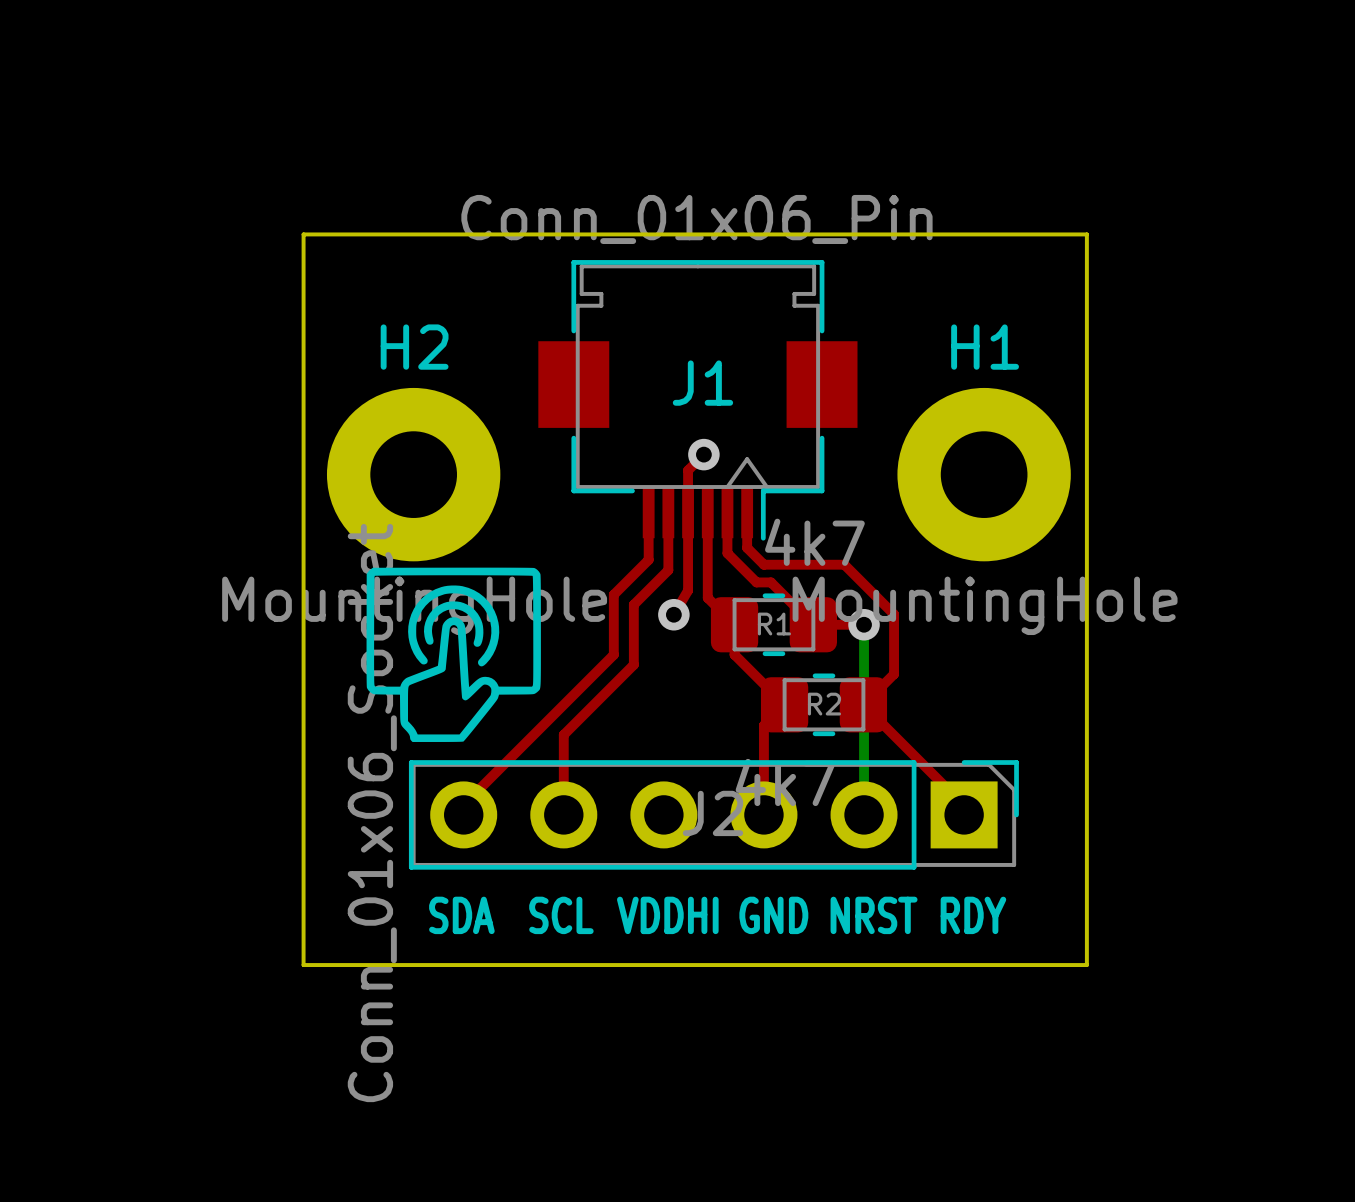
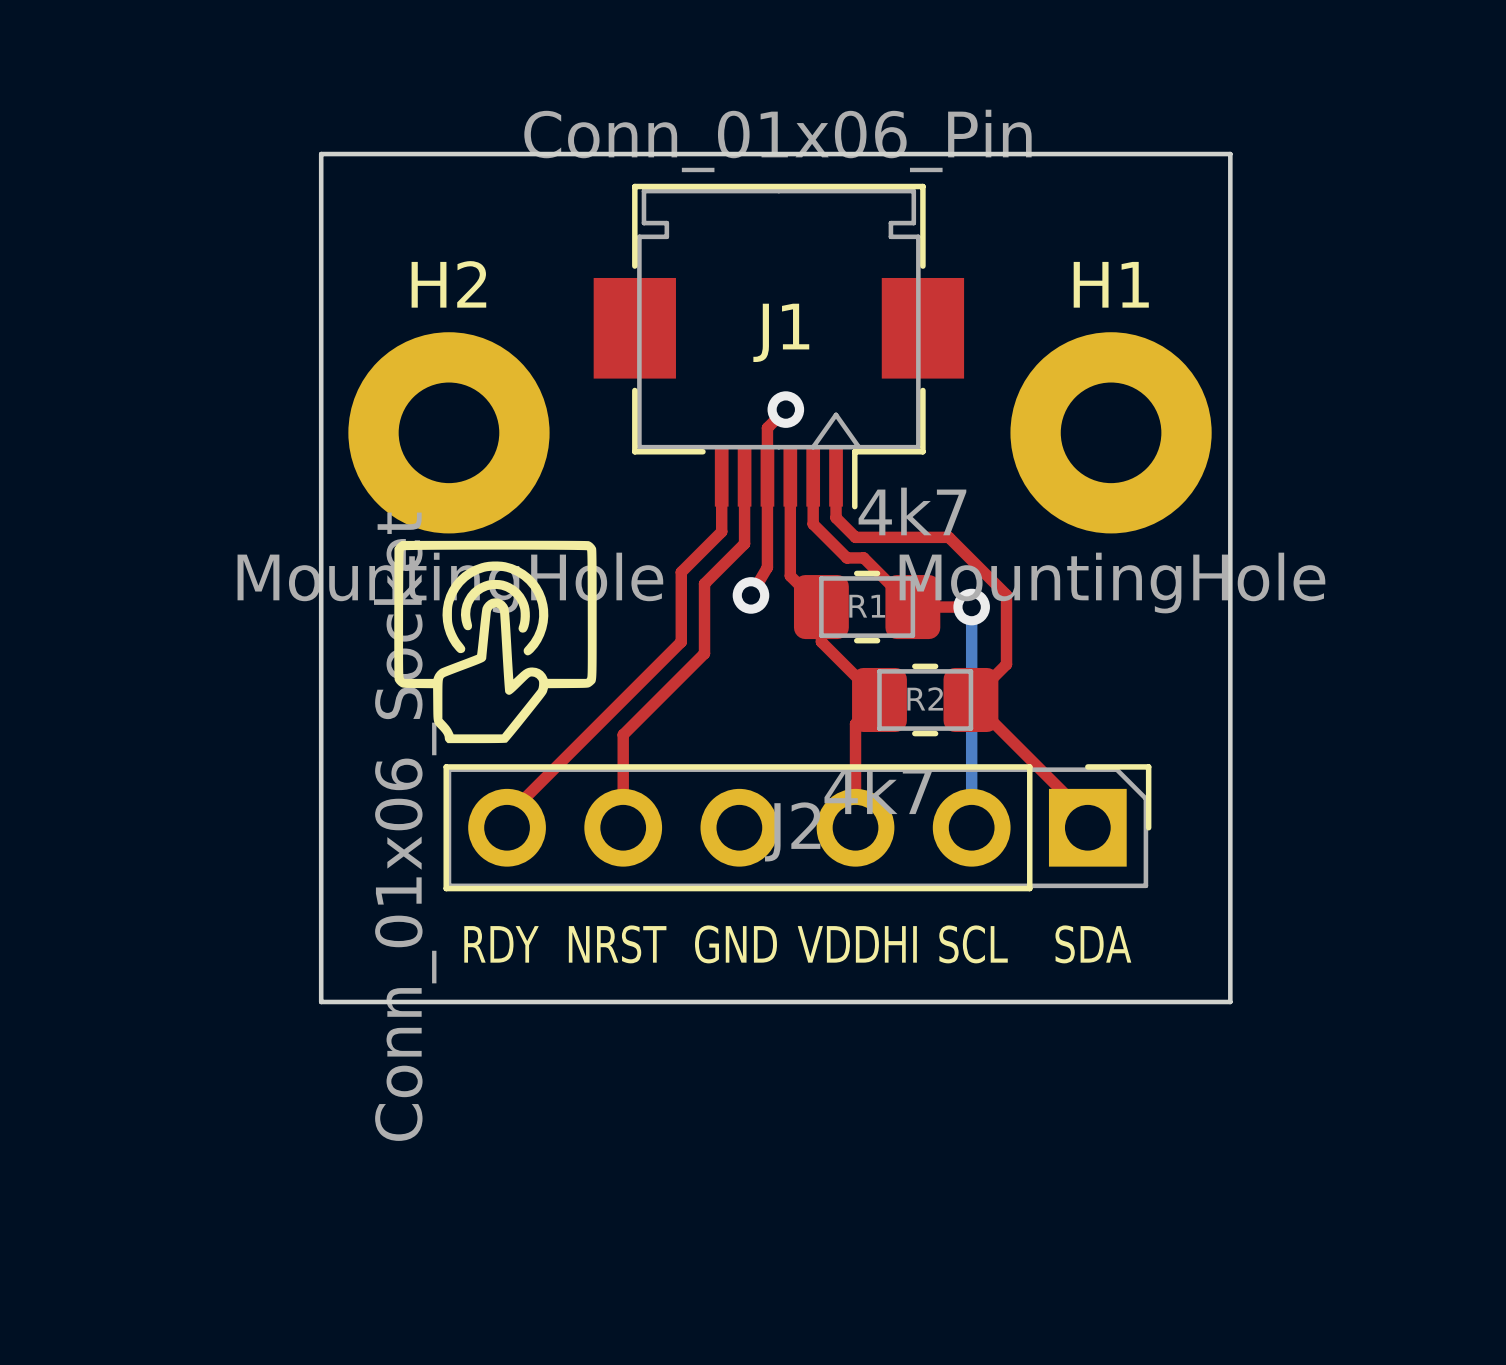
text: SDA (461, 915) -> RDY (501, 944)
text position: SCL (561, 915) -> SCL (973, 944)
text position: VDDHI (667, 915) -> VDDHI (857, 944)
text position: GND (773, 915) -> GND (735, 944)
text position: NRST (874, 915) -> NRST (617, 944)
text: RDY (973, 915) -> SDA (1093, 944)

